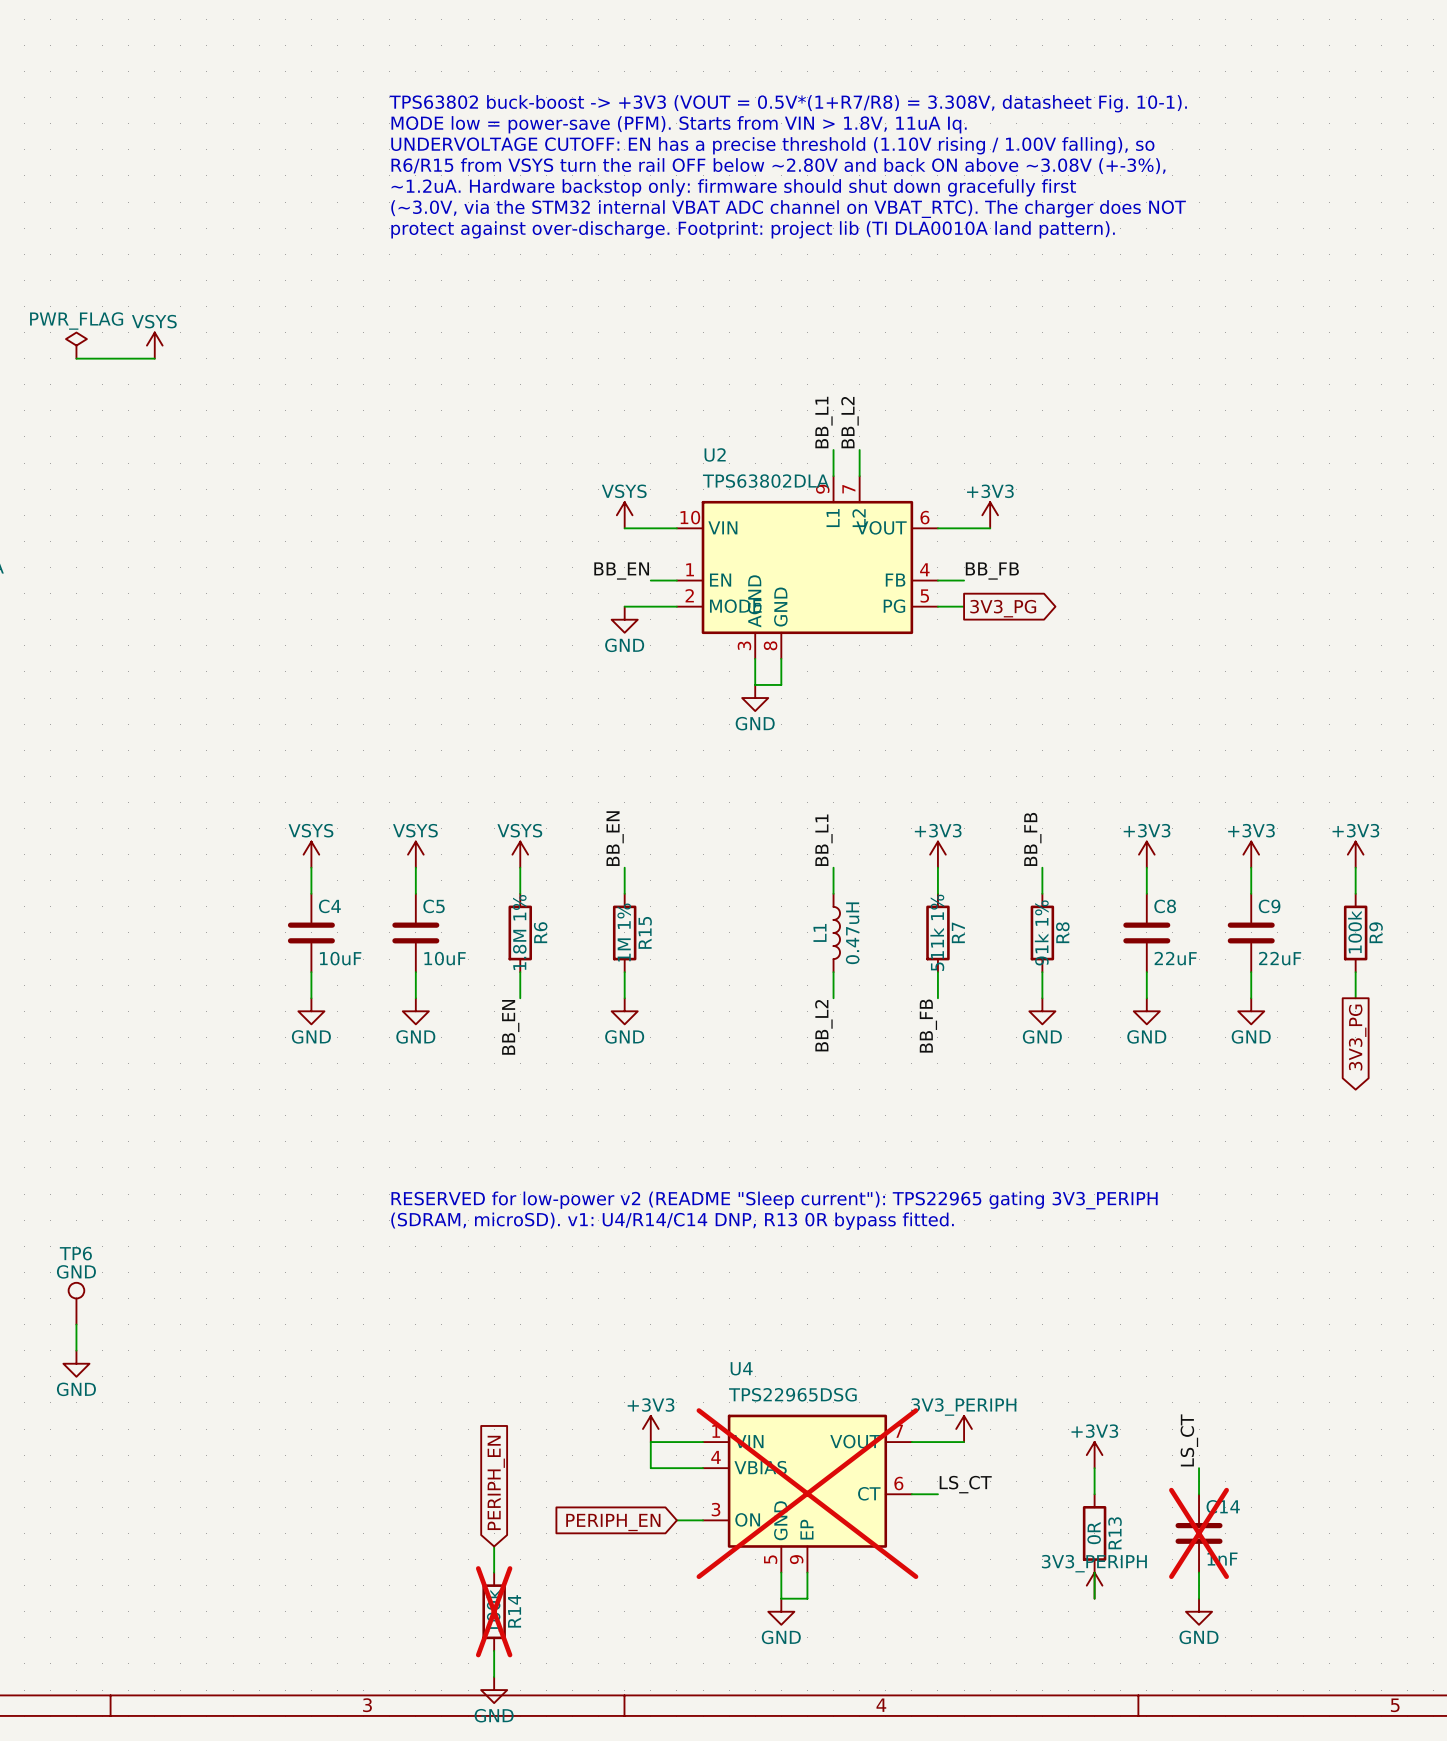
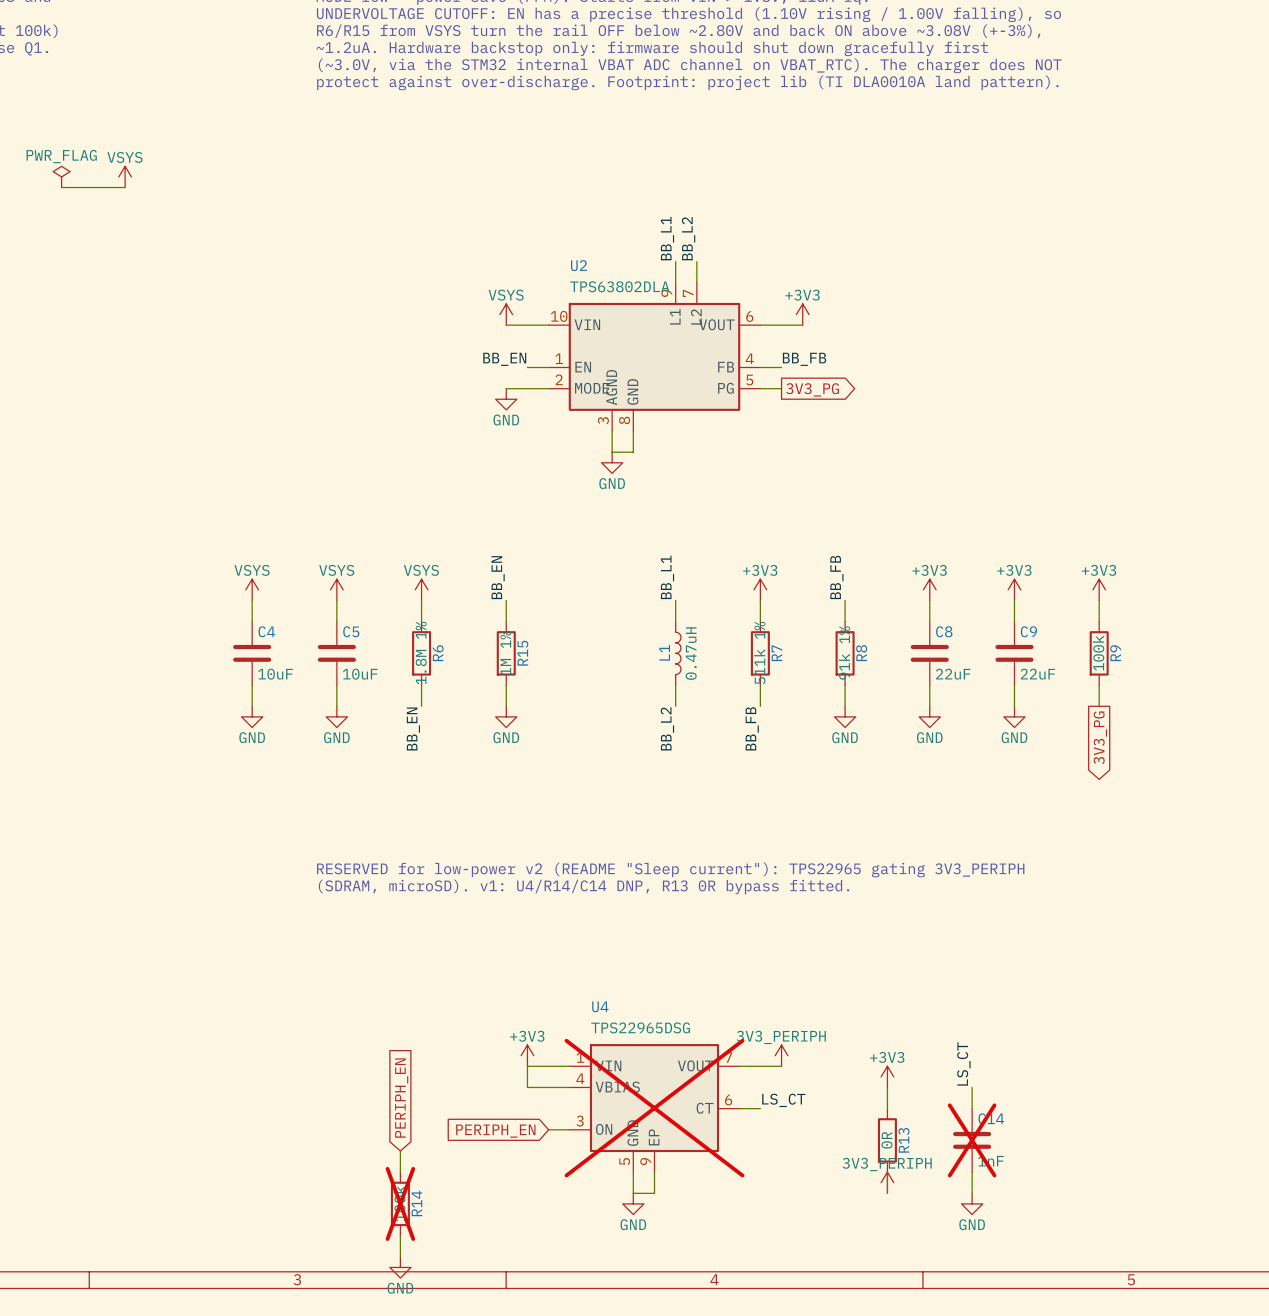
TP6: GND (76, 1303) -> none
wire: (76, 1324) (76, 1350) -> none
power symbol: GND (76, 1363) -> none

